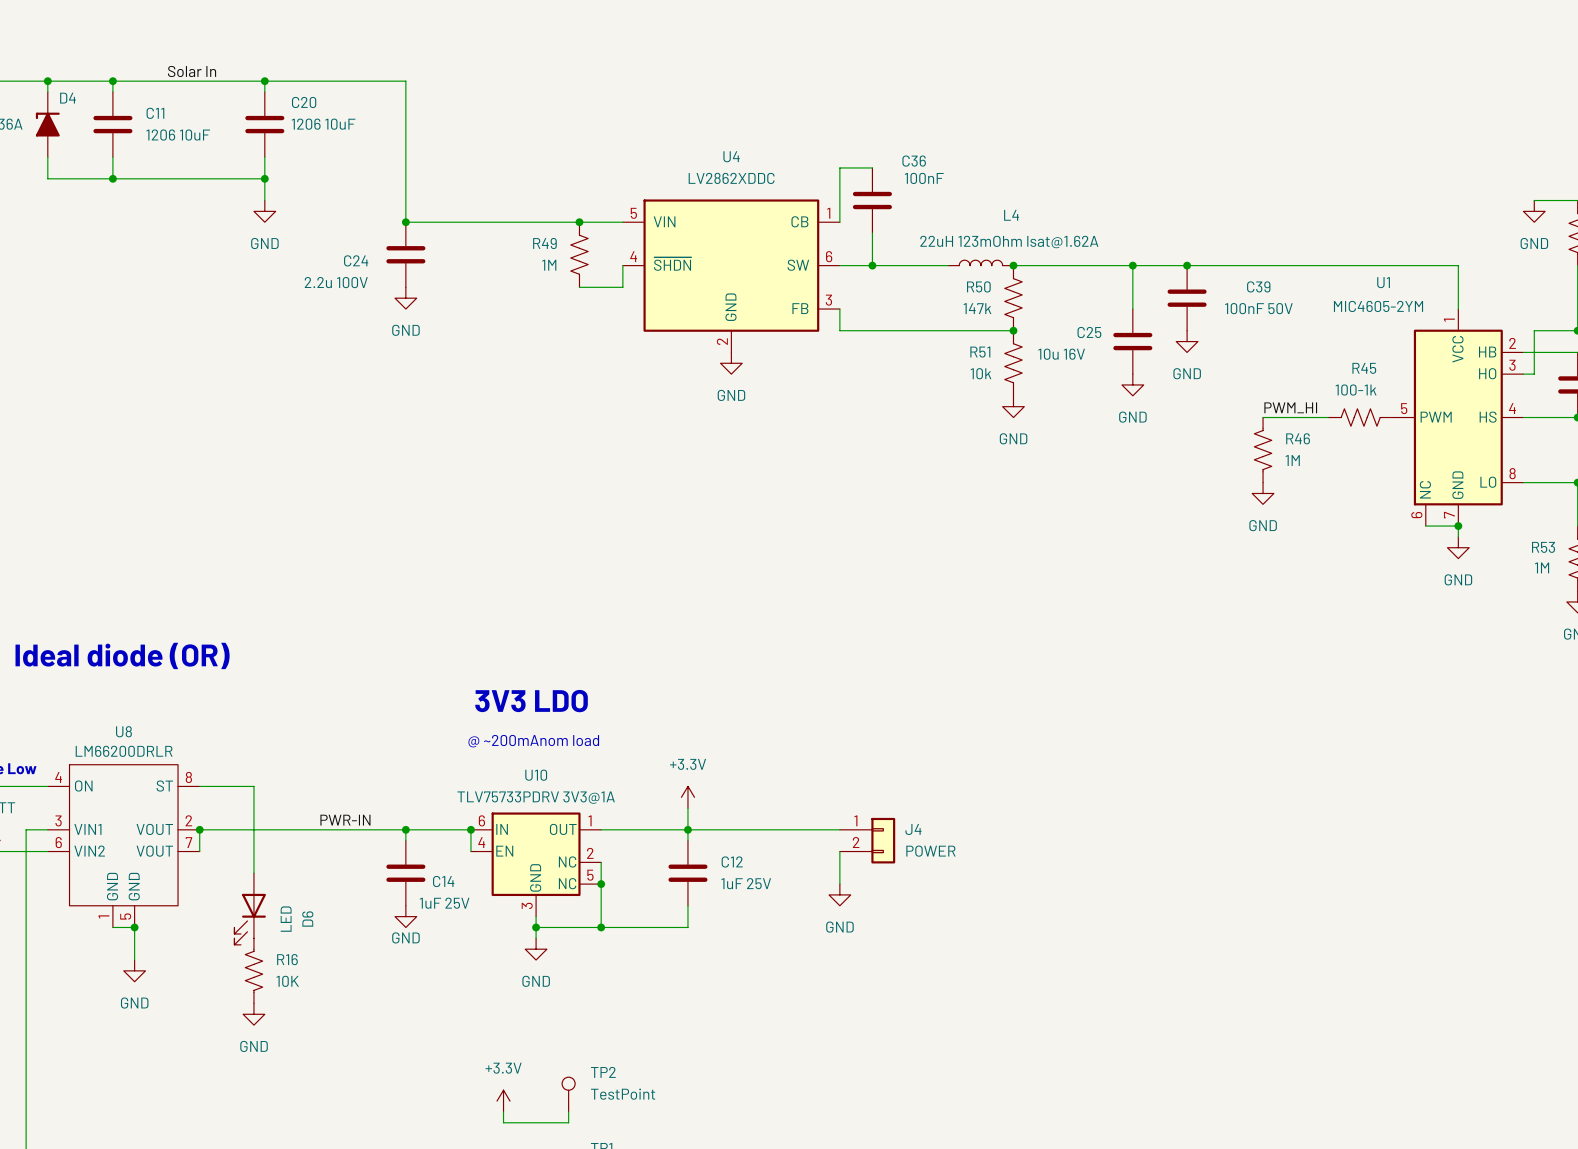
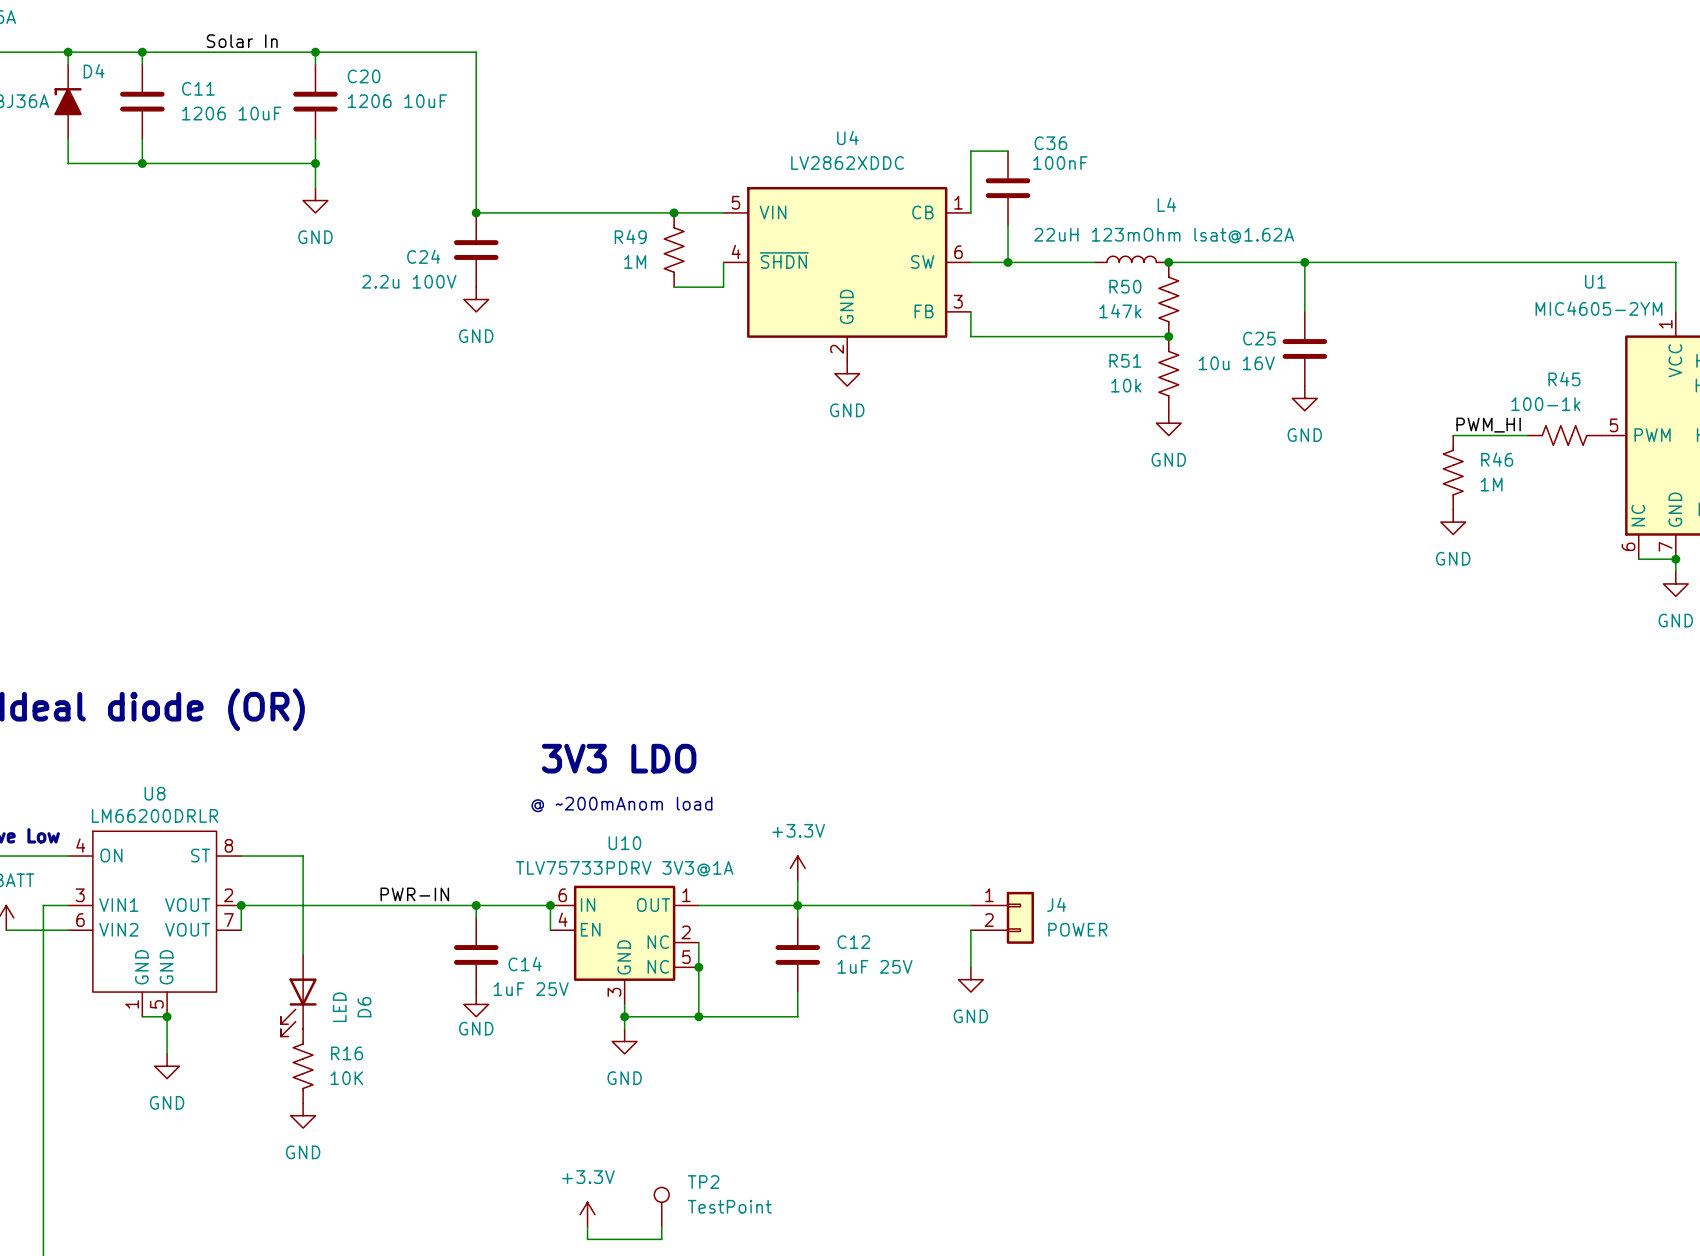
junction: (1187, 265) -> none
C39: 100nF 50V (1187, 298) -> none
power symbol: GND (1187, 341) -> none

